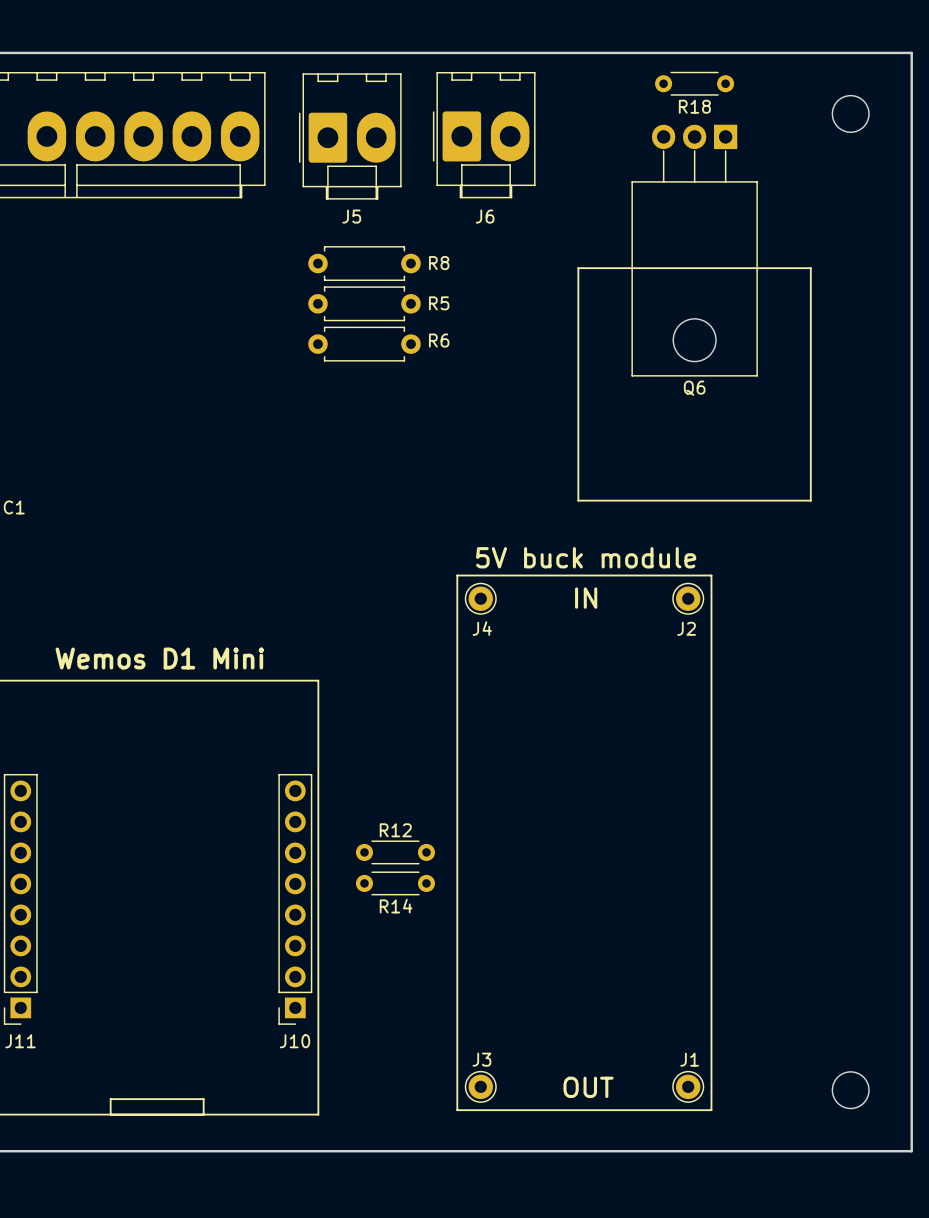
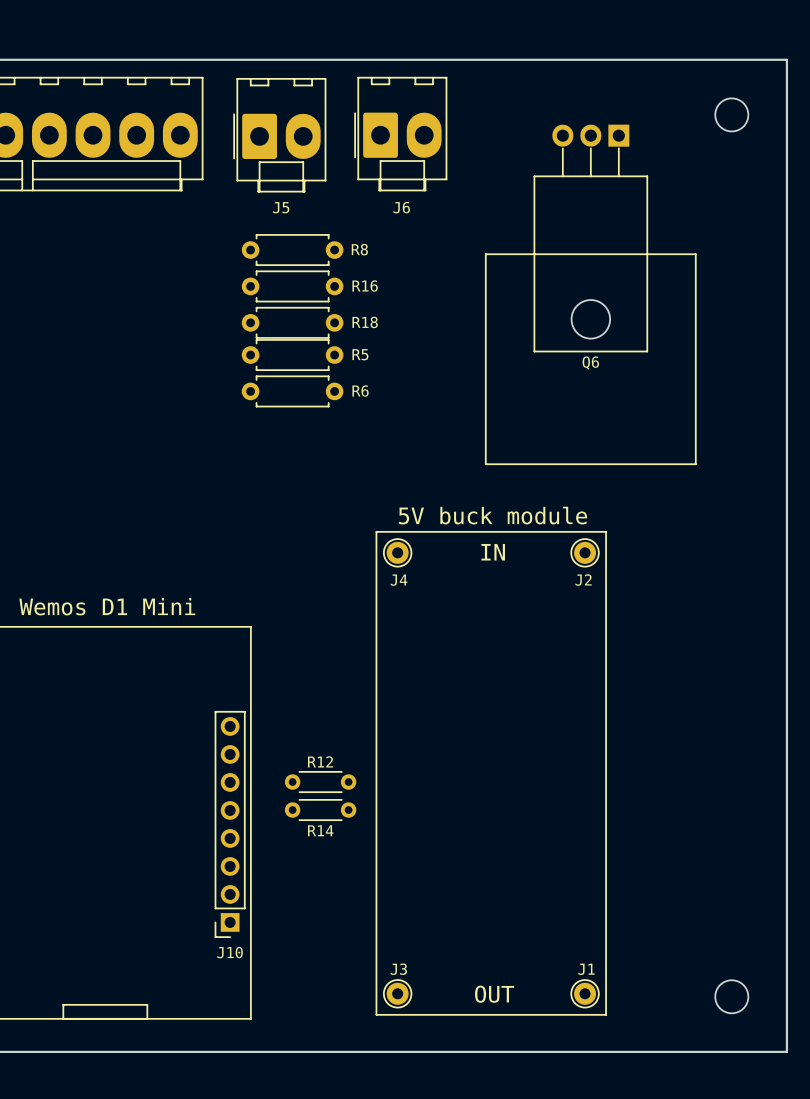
R18: (694, 83) -> none
R5 name: R5 (439, 303) -> R16 (365, 286)
R6 name: R6 (439, 340) -> R18 (365, 322)
R5: none -> (292, 355)
R6: none -> (292, 391)

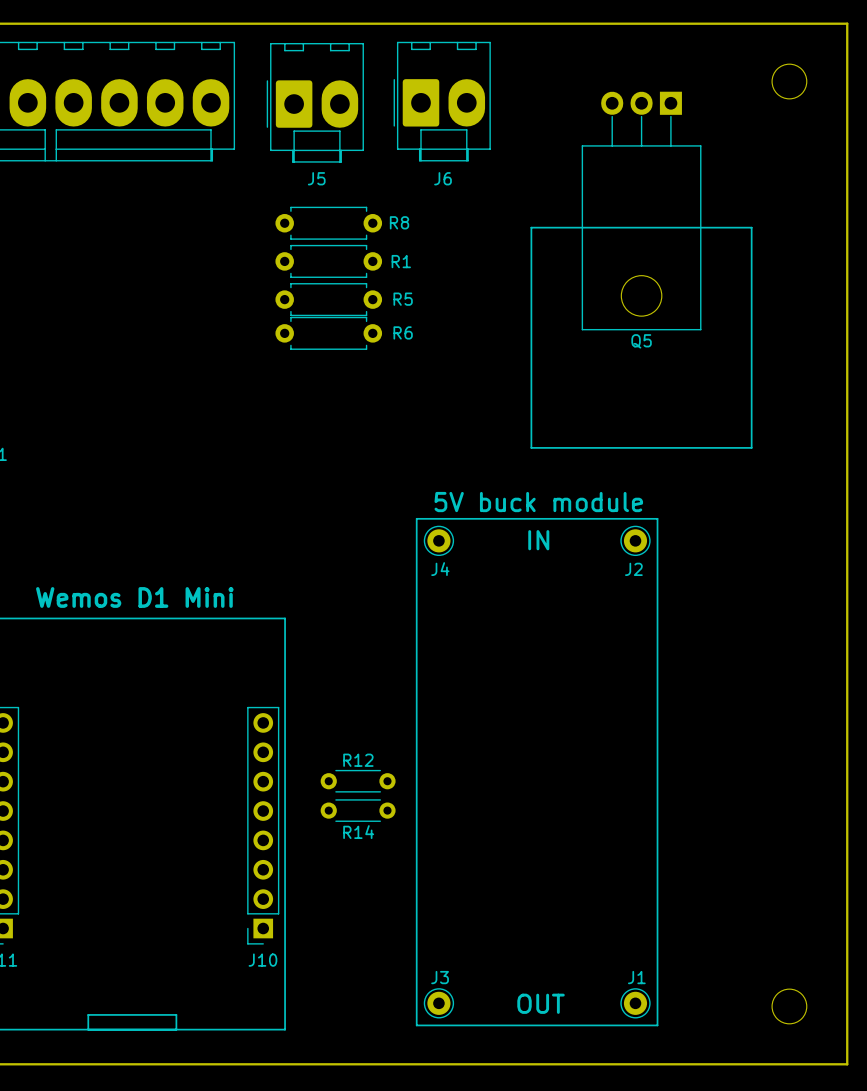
R16 name: R16 (365, 286) -> R1 (401, 261)
R18 name: R18 (365, 322) -> R5 (403, 299)
R5 name: R5 (360, 354) -> R6 (403, 332)
Q6 name: Q6 (590, 363) -> Q5 (641, 341)
R6: (292, 391) -> none

